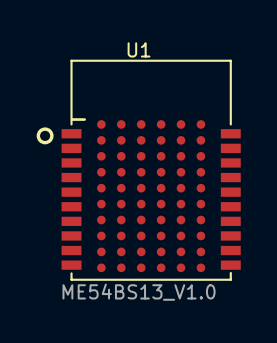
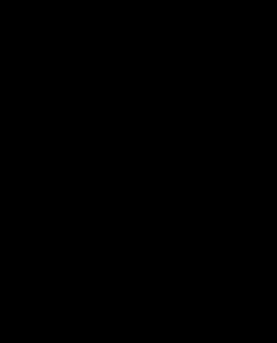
U1: ME54BS13_V1.0 (138, 170) -> none

